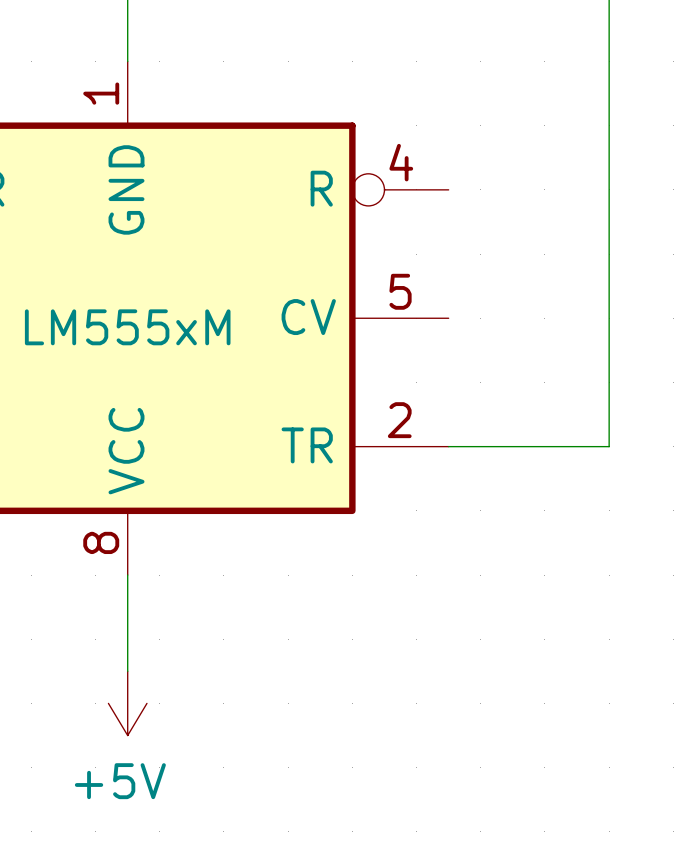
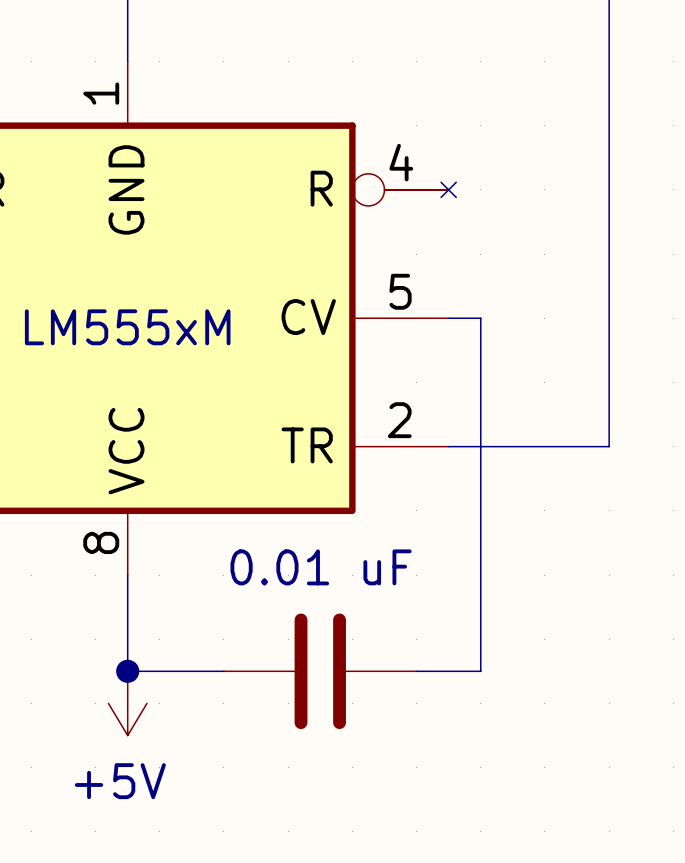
power symbol: none -> (420, 189)
wire: none -> (448, 318) (480, 318) (480, 671) (416, 671)
wire: none -> (127, 671) (223, 671)
junction: none -> (127, 671)
part: none -> 0.01 uF (320, 671)

